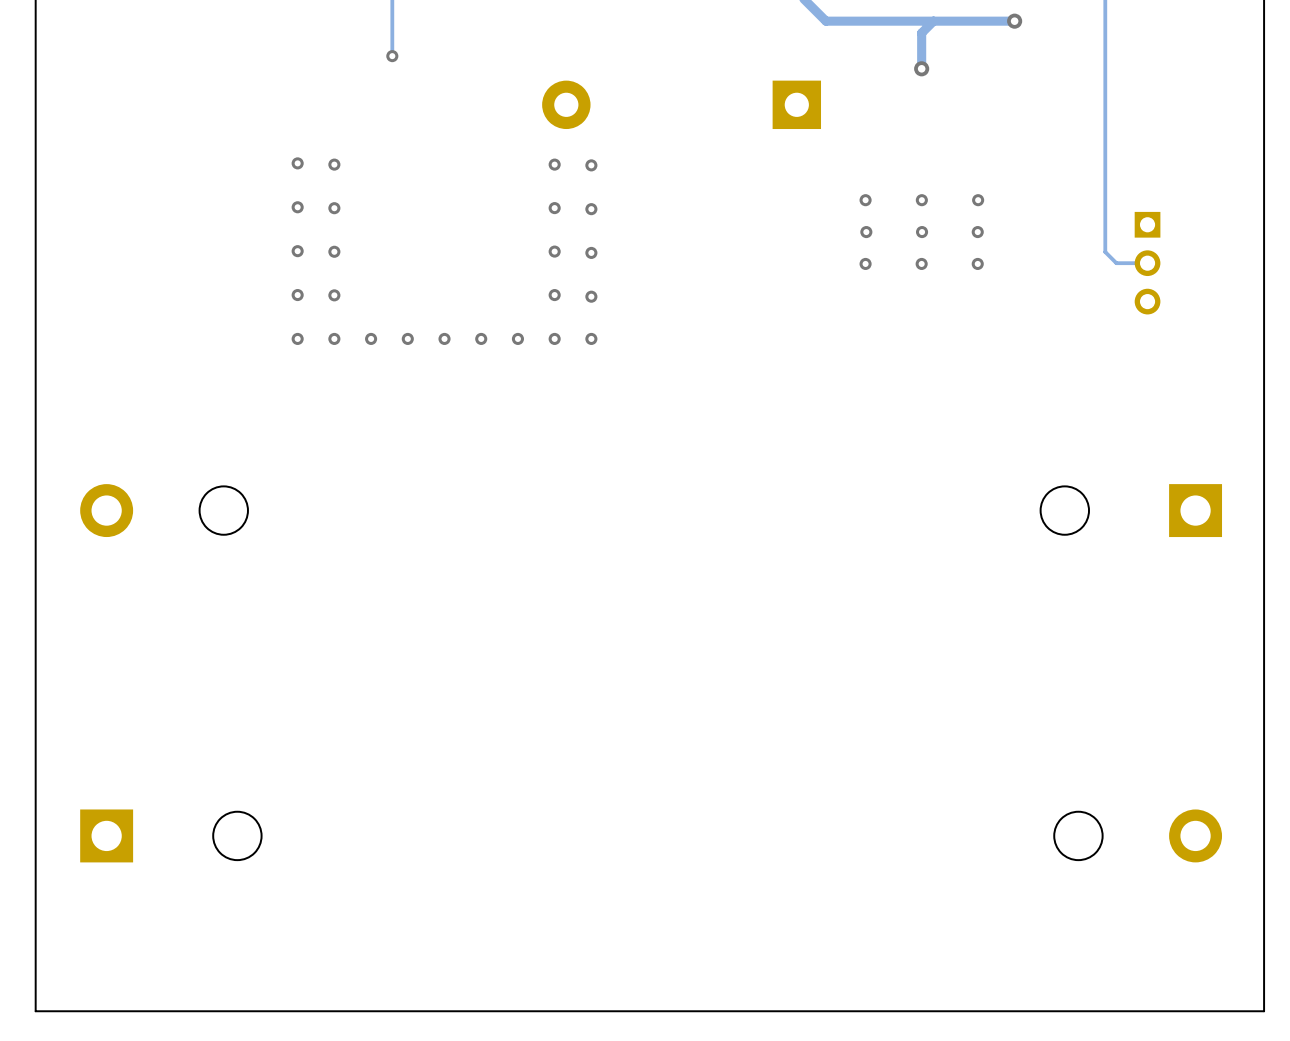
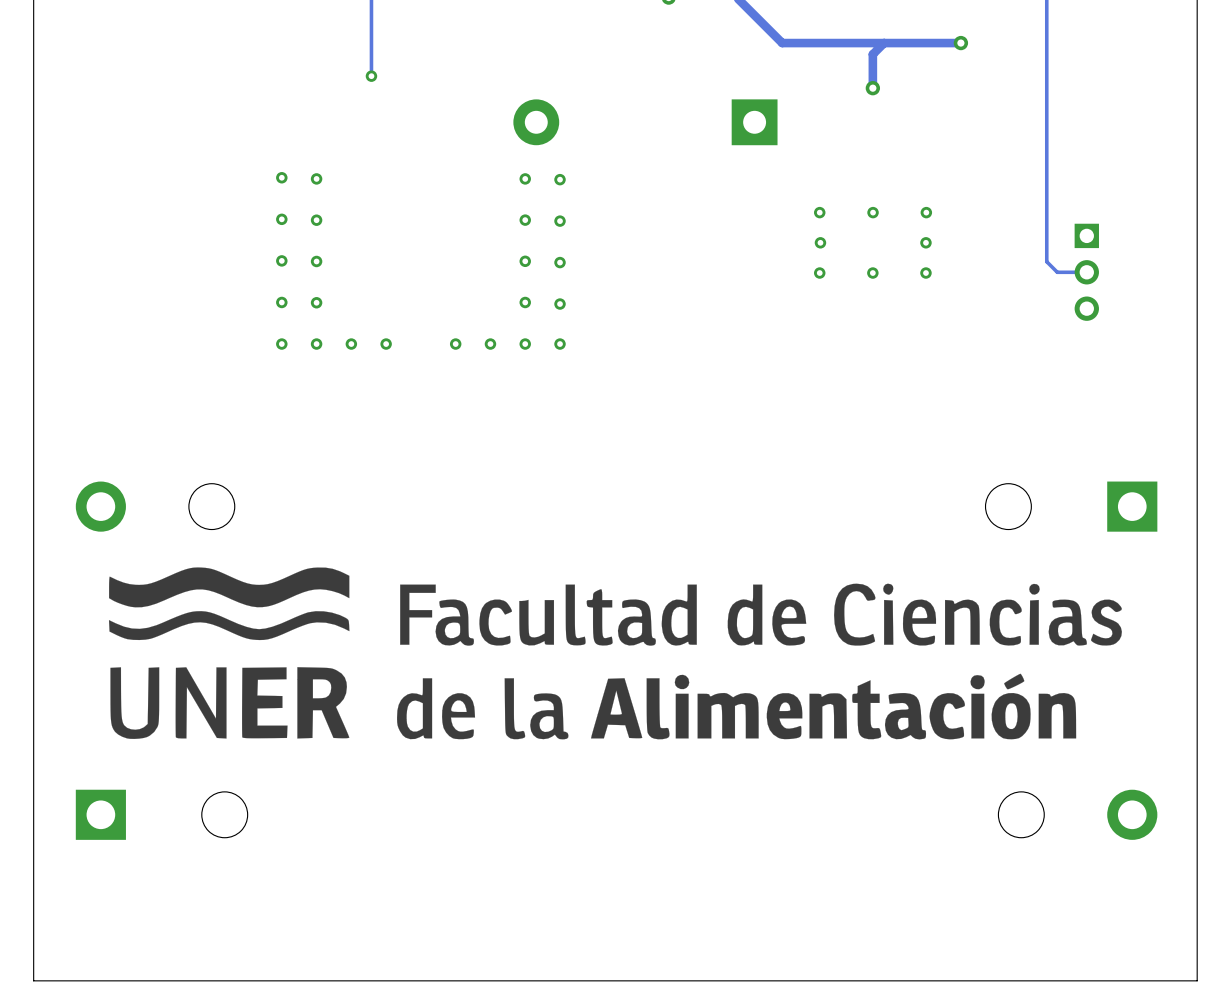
via: (922, 232) -> none
via: (444, 338) -> none
drawing: none -> [108, 567, 1122, 740]

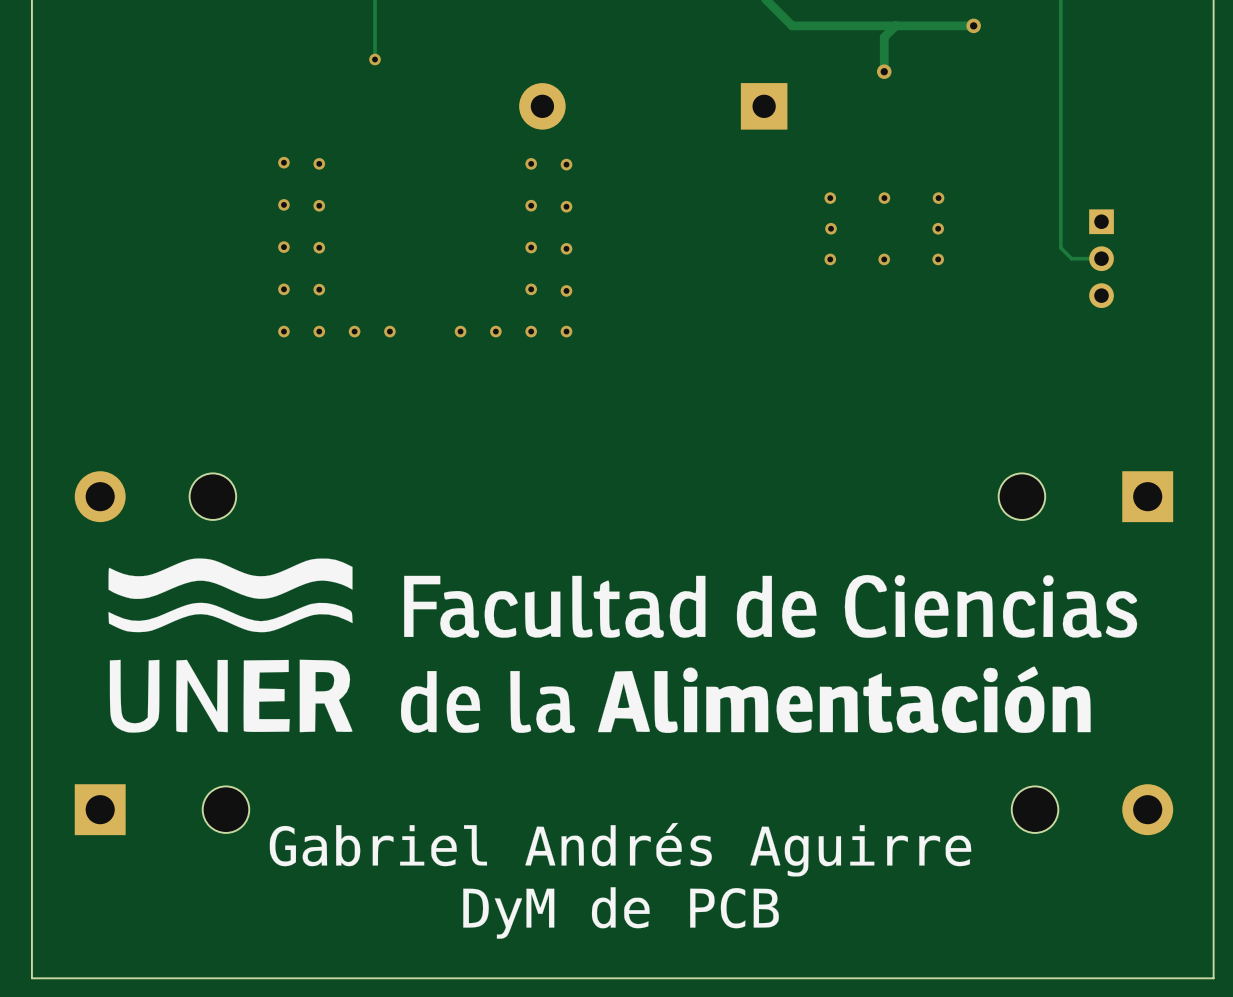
drawing: none -> [269, 822, 972, 939]

